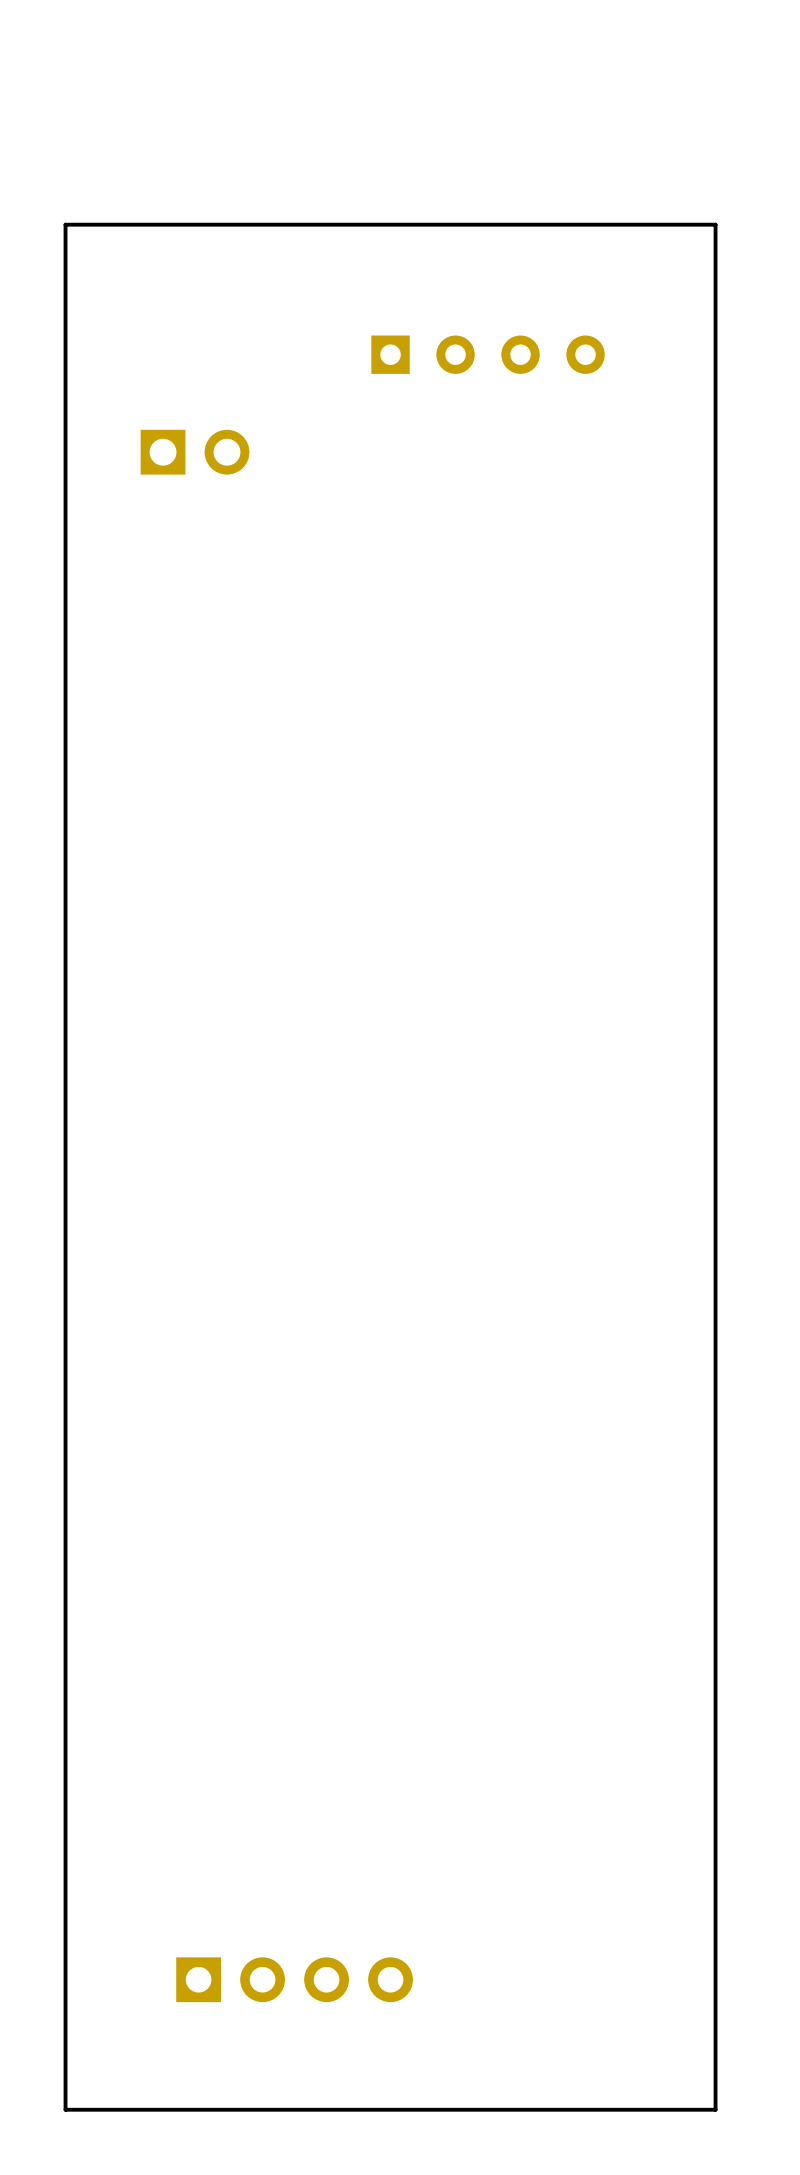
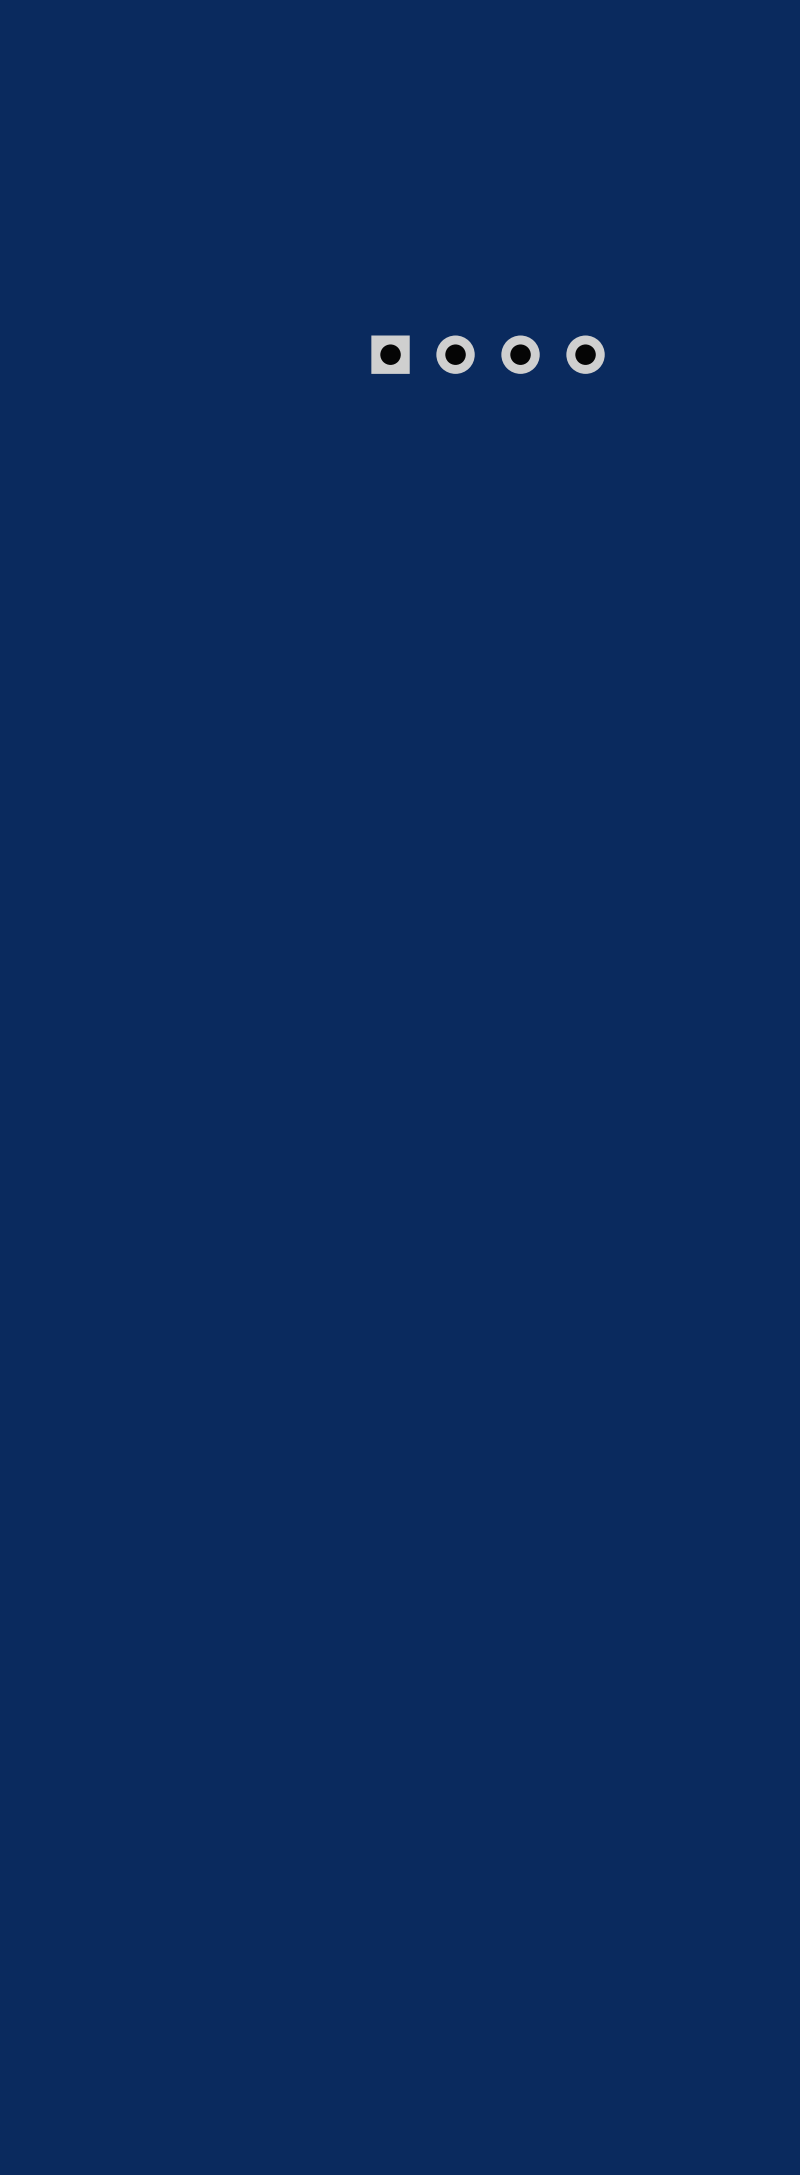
board edge: (715, 224) (715, 2109) (65, 2109) (65, 224) (715, 224) -> none
part: (195, 452) -> none
part: (294, 1979) -> none

